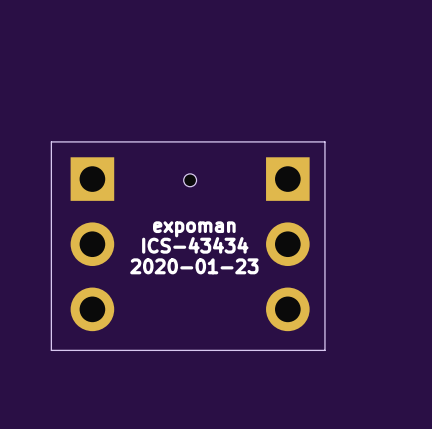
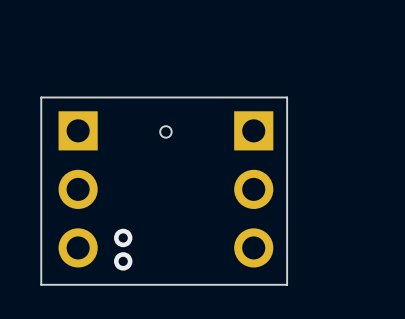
text: expoman (194, 229) -> none
text: ICS-43434 (195, 245) -> none
text: 2020-01-23 (194, 266) -> none
via: none -> (123, 237)
via: none -> (123, 261)

